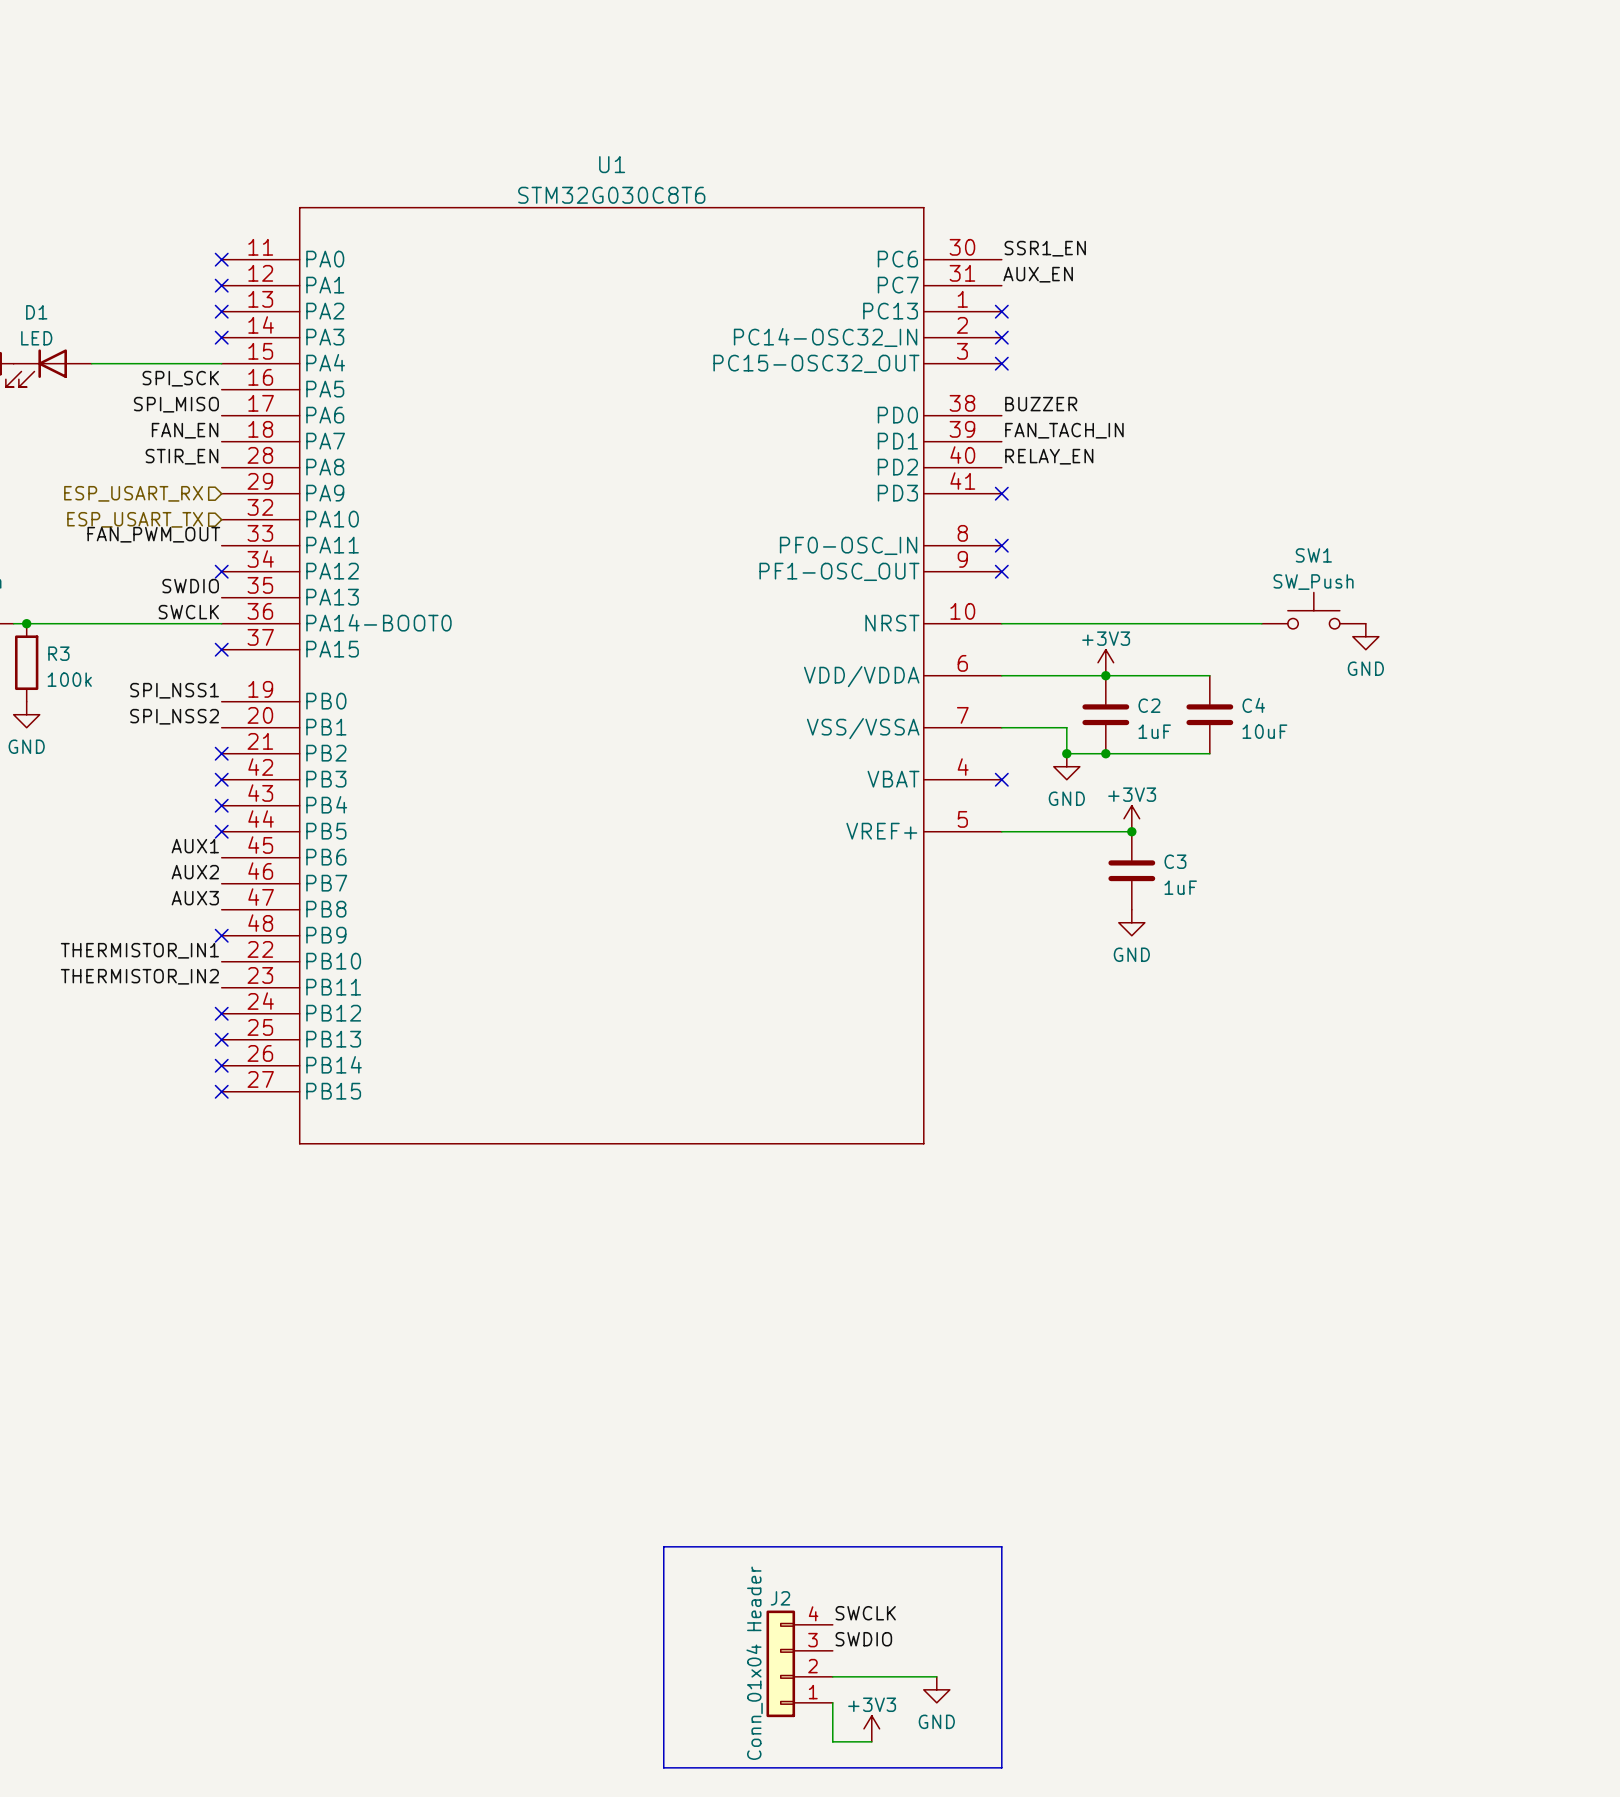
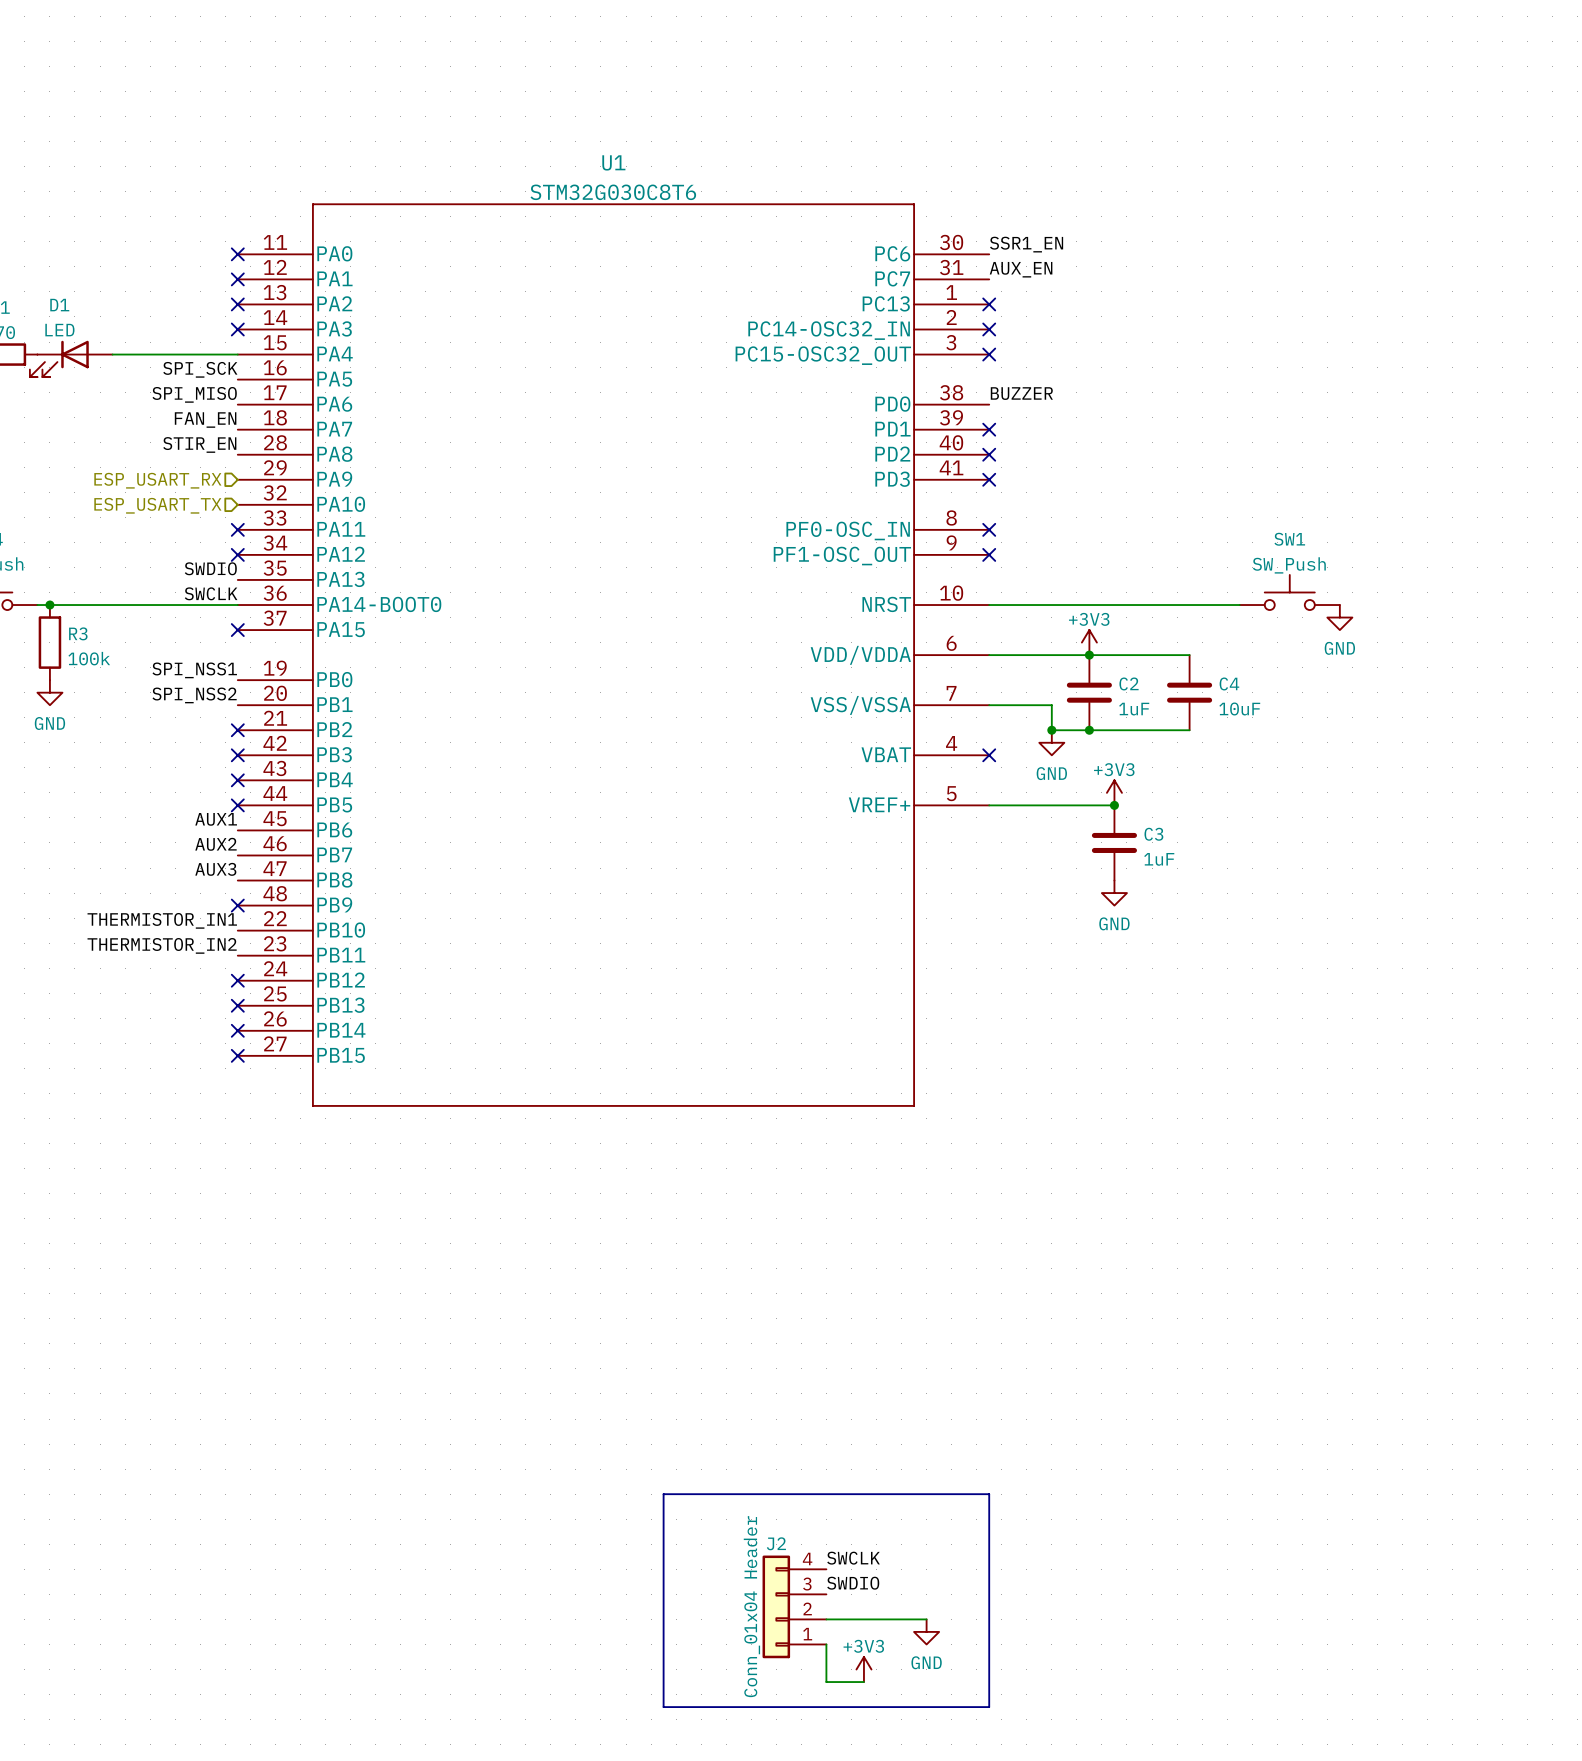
label: FAN_TACH_IN (1064, 430) -> none
no-connect mark: none -> (989, 429)
label: RELAY_EN (1049, 456) -> none
no-connect mark: none -> (989, 454)
label: FAN_PWM_OUT (153, 534) -> none
no-connect mark: none -> (237, 529)

